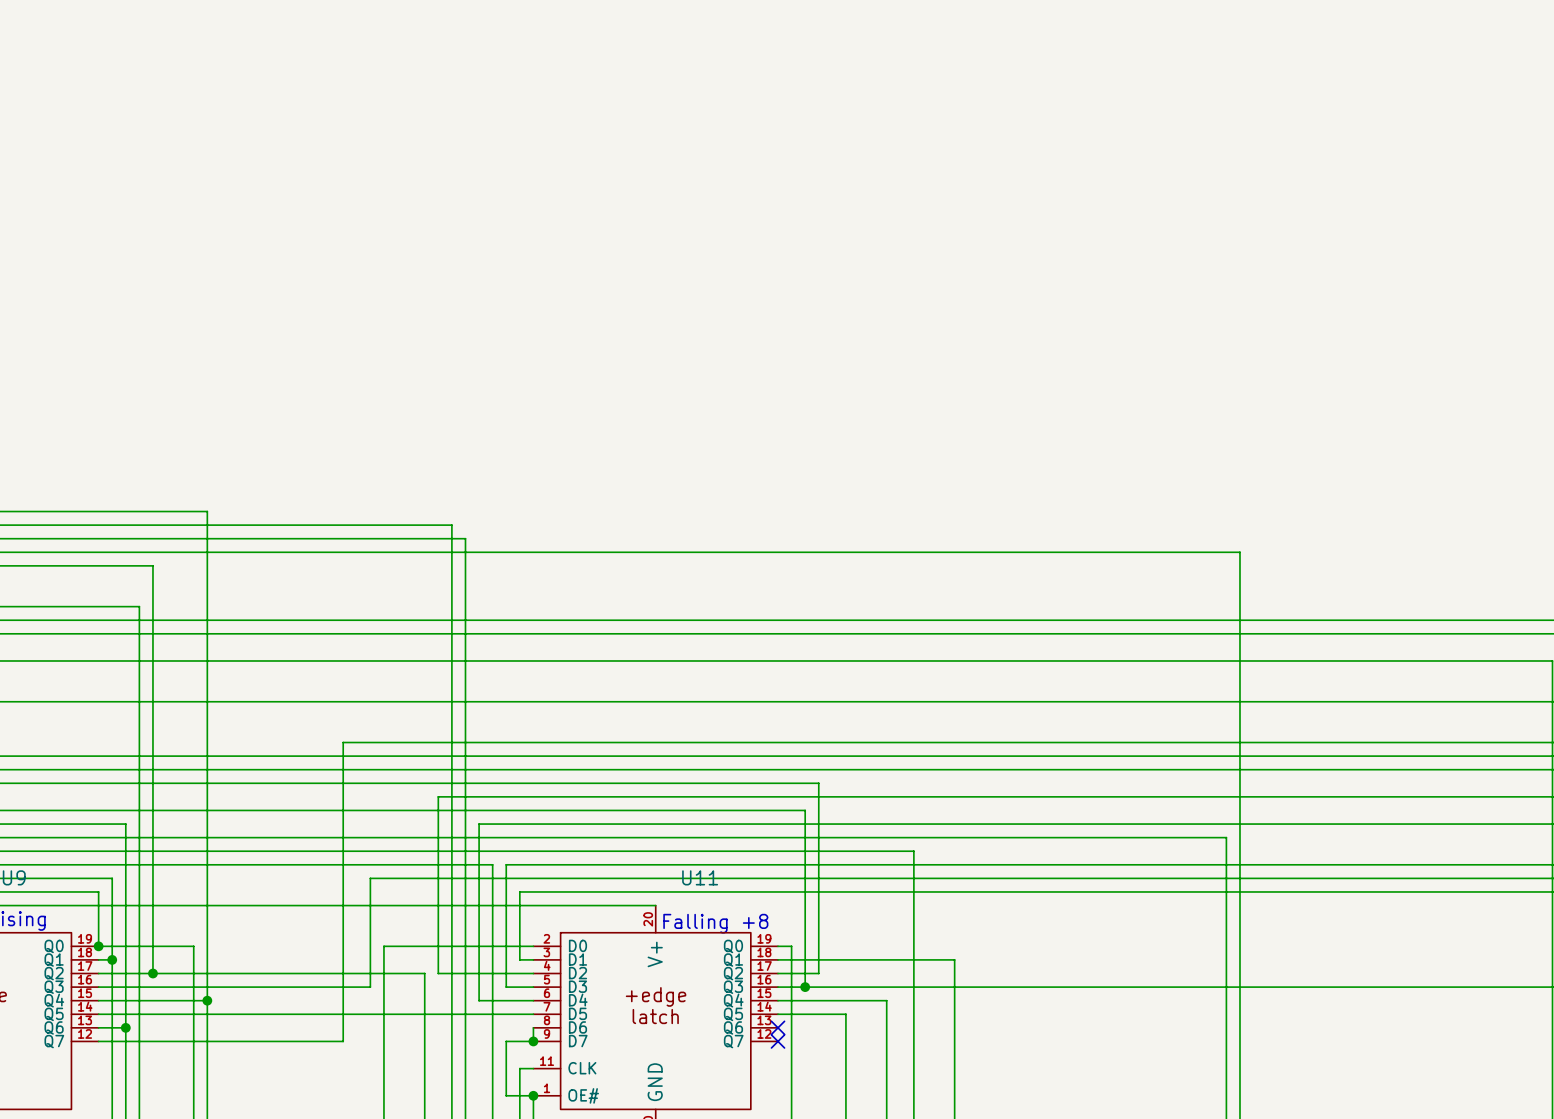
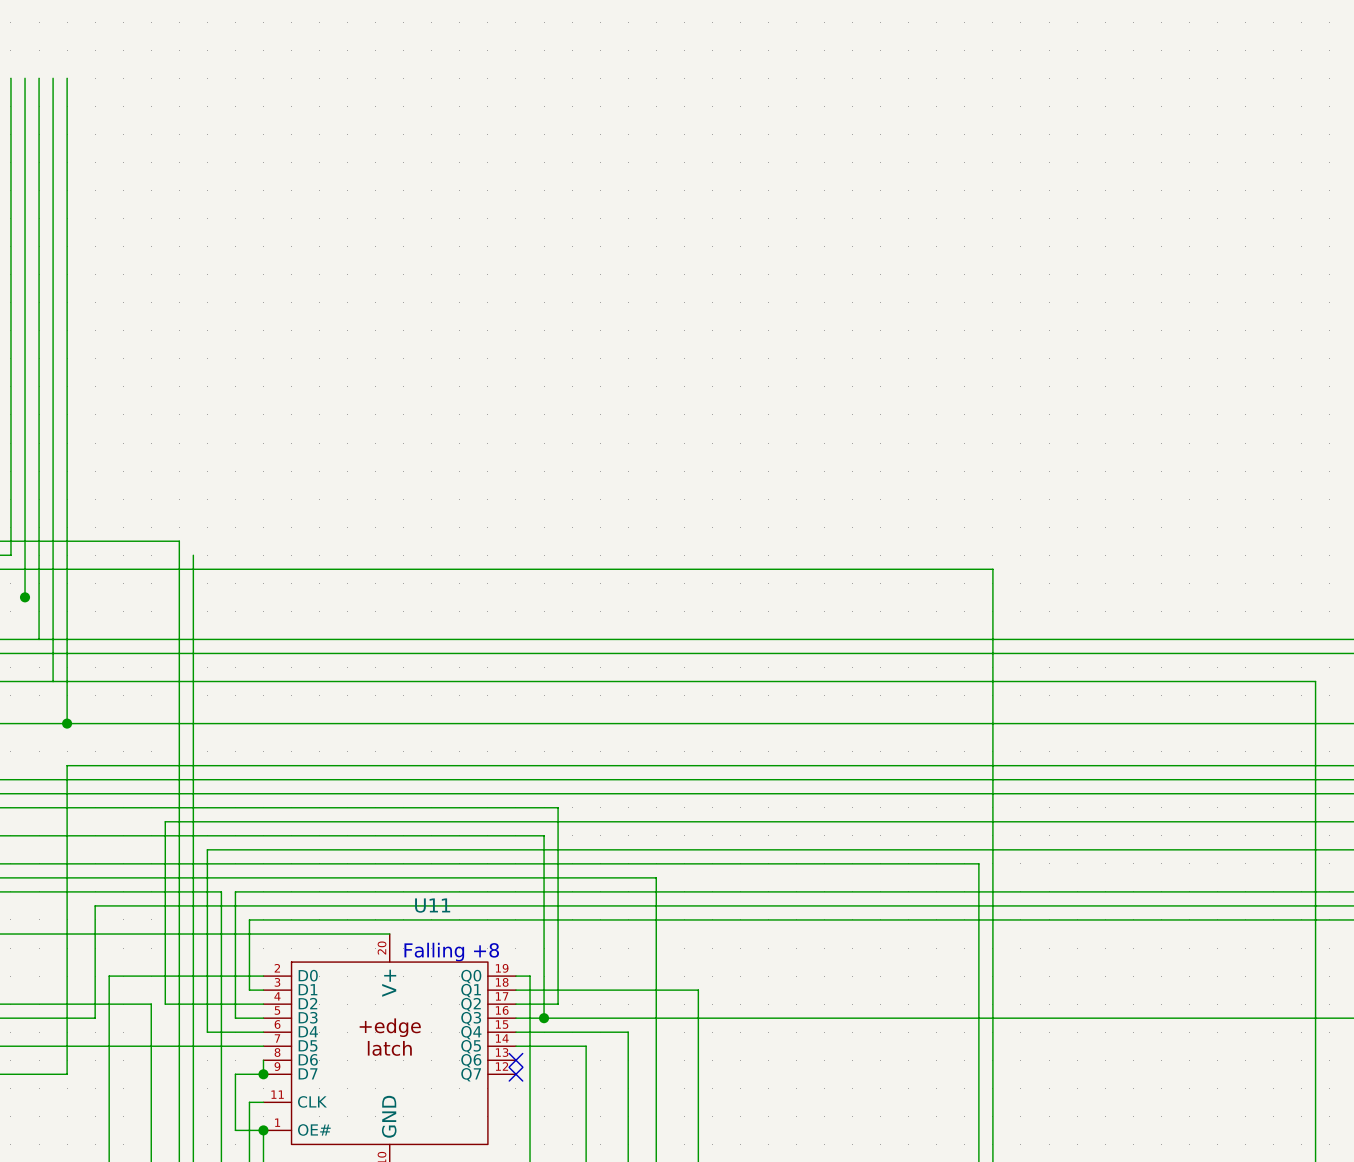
wire: none -> (25, 78) (25, 597)
wire: none -> (39, 78) (39, 639)
wire: none -> (53, 78) (53, 681)
wire: none -> (67, 78) (67, 723)
wire: (288, 538) (465, 538) -> (10, 555) (10, 78)
junction: none -> (25, 597)
junction: none -> (67, 723)

